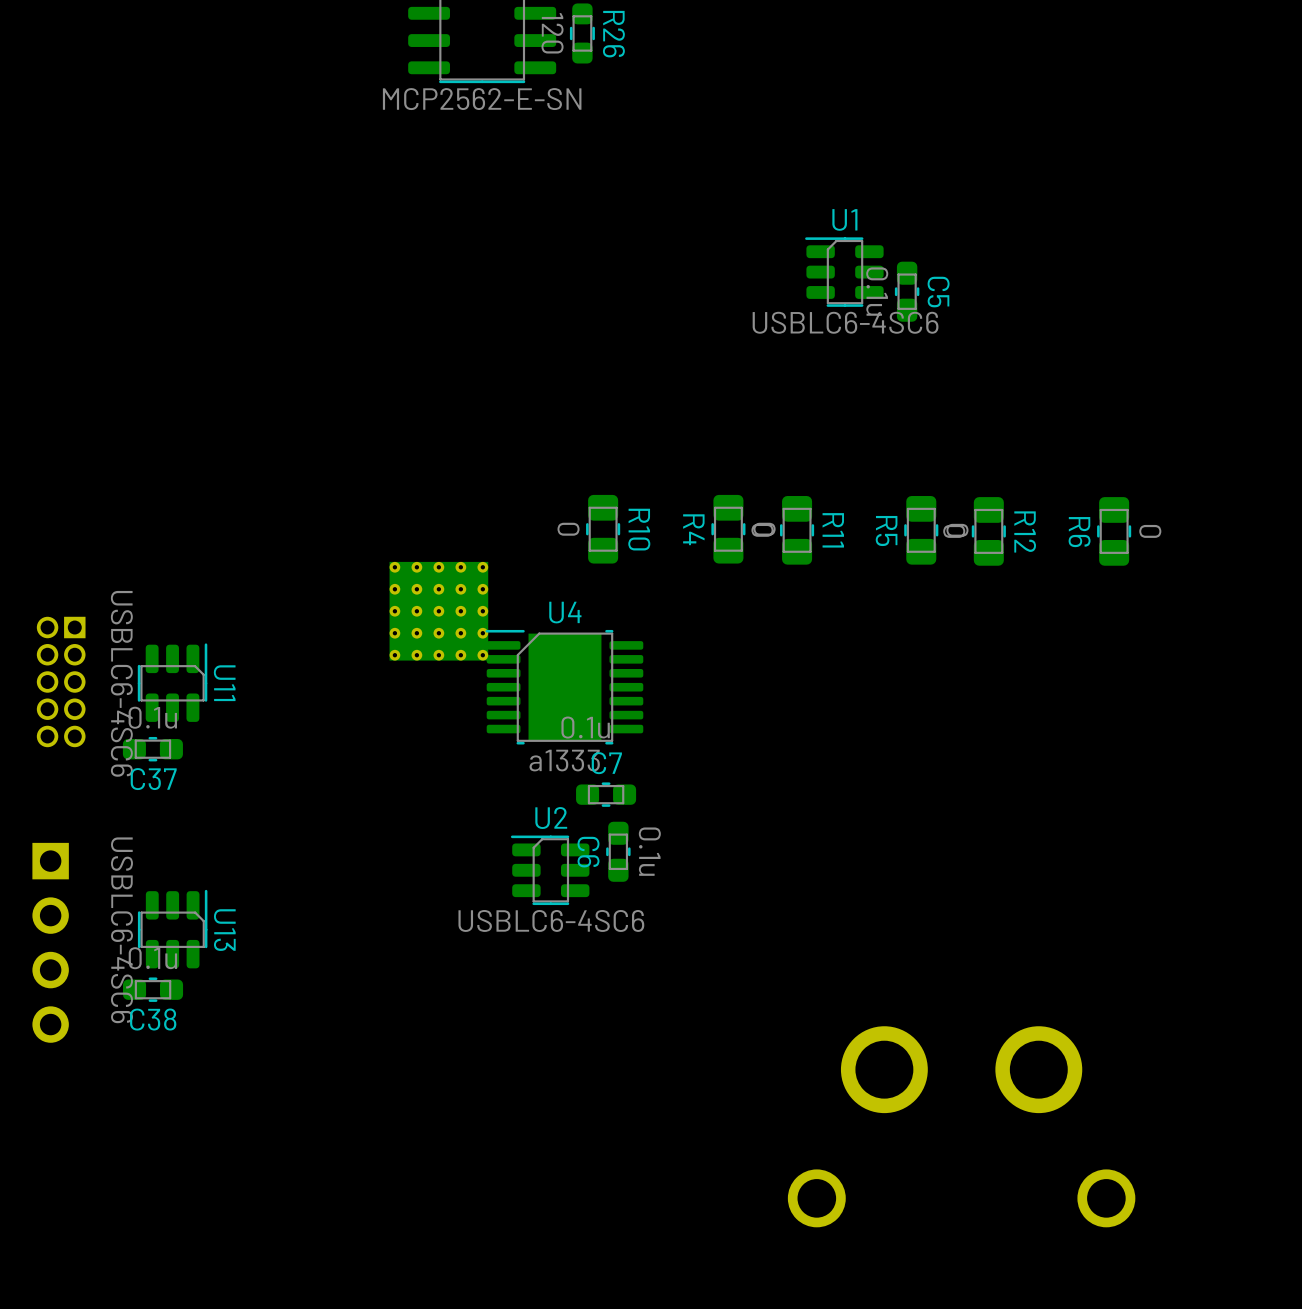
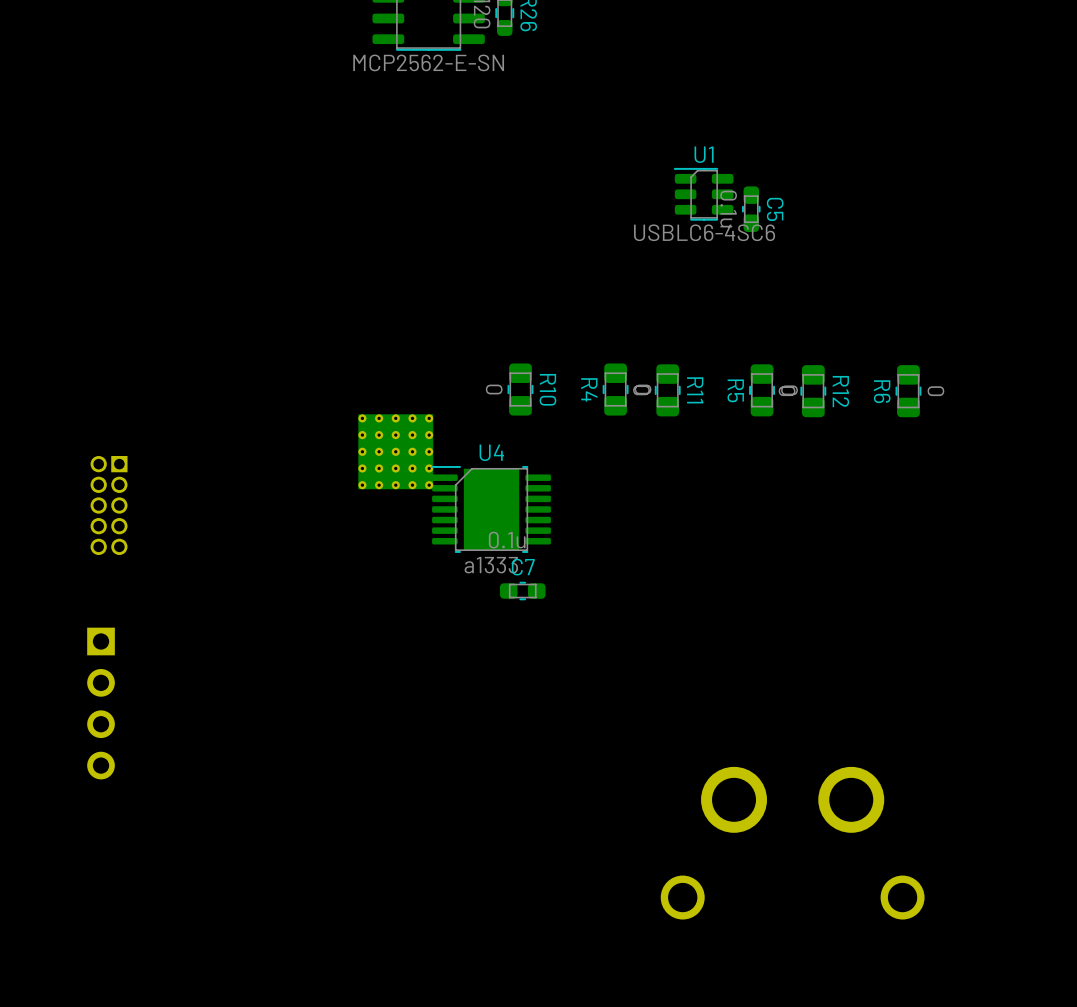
U11: USBLC6-4SC6 (172, 682) -> none
C37: 0.1u (152, 749) -> none
C6: 0.1u (618, 851) -> none
U2: USBLC6-4SC6 (550, 870) -> none
U13: USBLC6-4SC6 (172, 929) -> none
C38: 0.1u (153, 989) -> none

